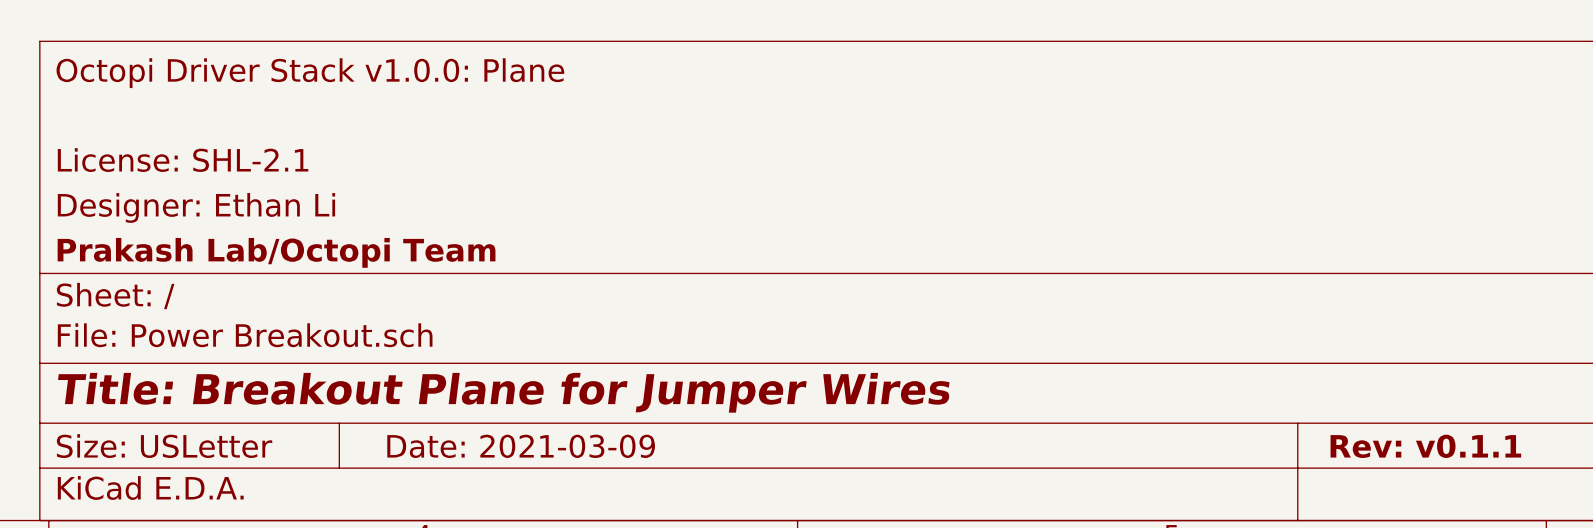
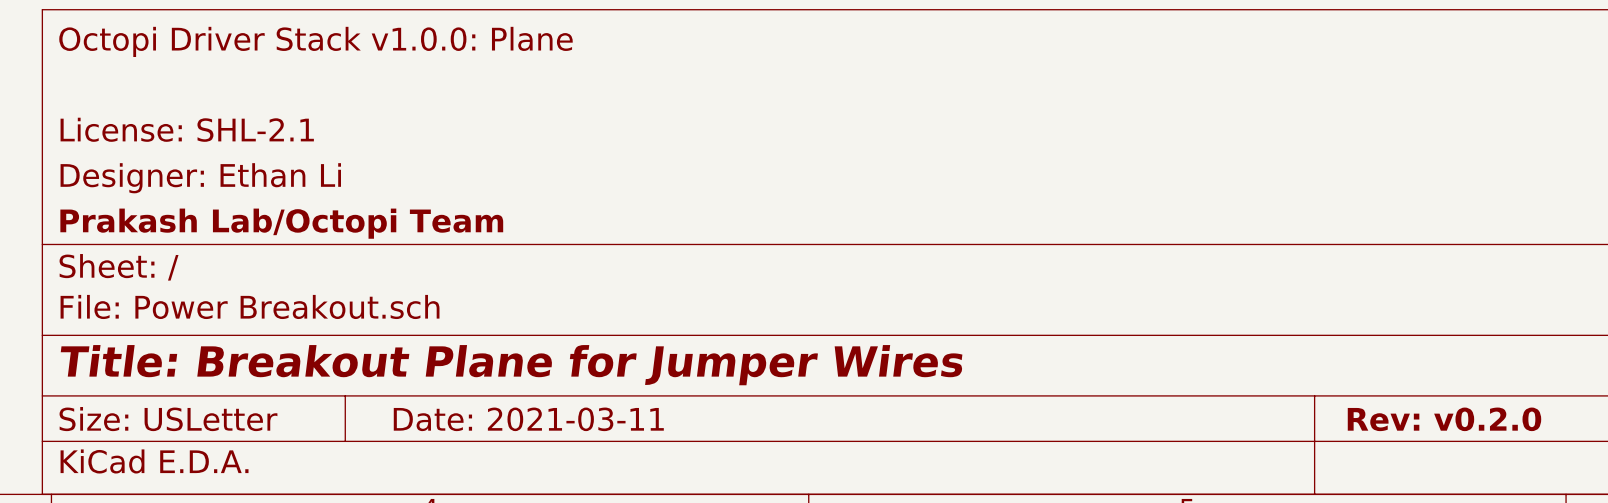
title block: Date: 2021-03-09 (521, 446) -> Date: 2021-03-11 (528, 419)
title block: Rev: v0.1.1 (1425, 446) -> Rev: v0.2.0 (1444, 419)

